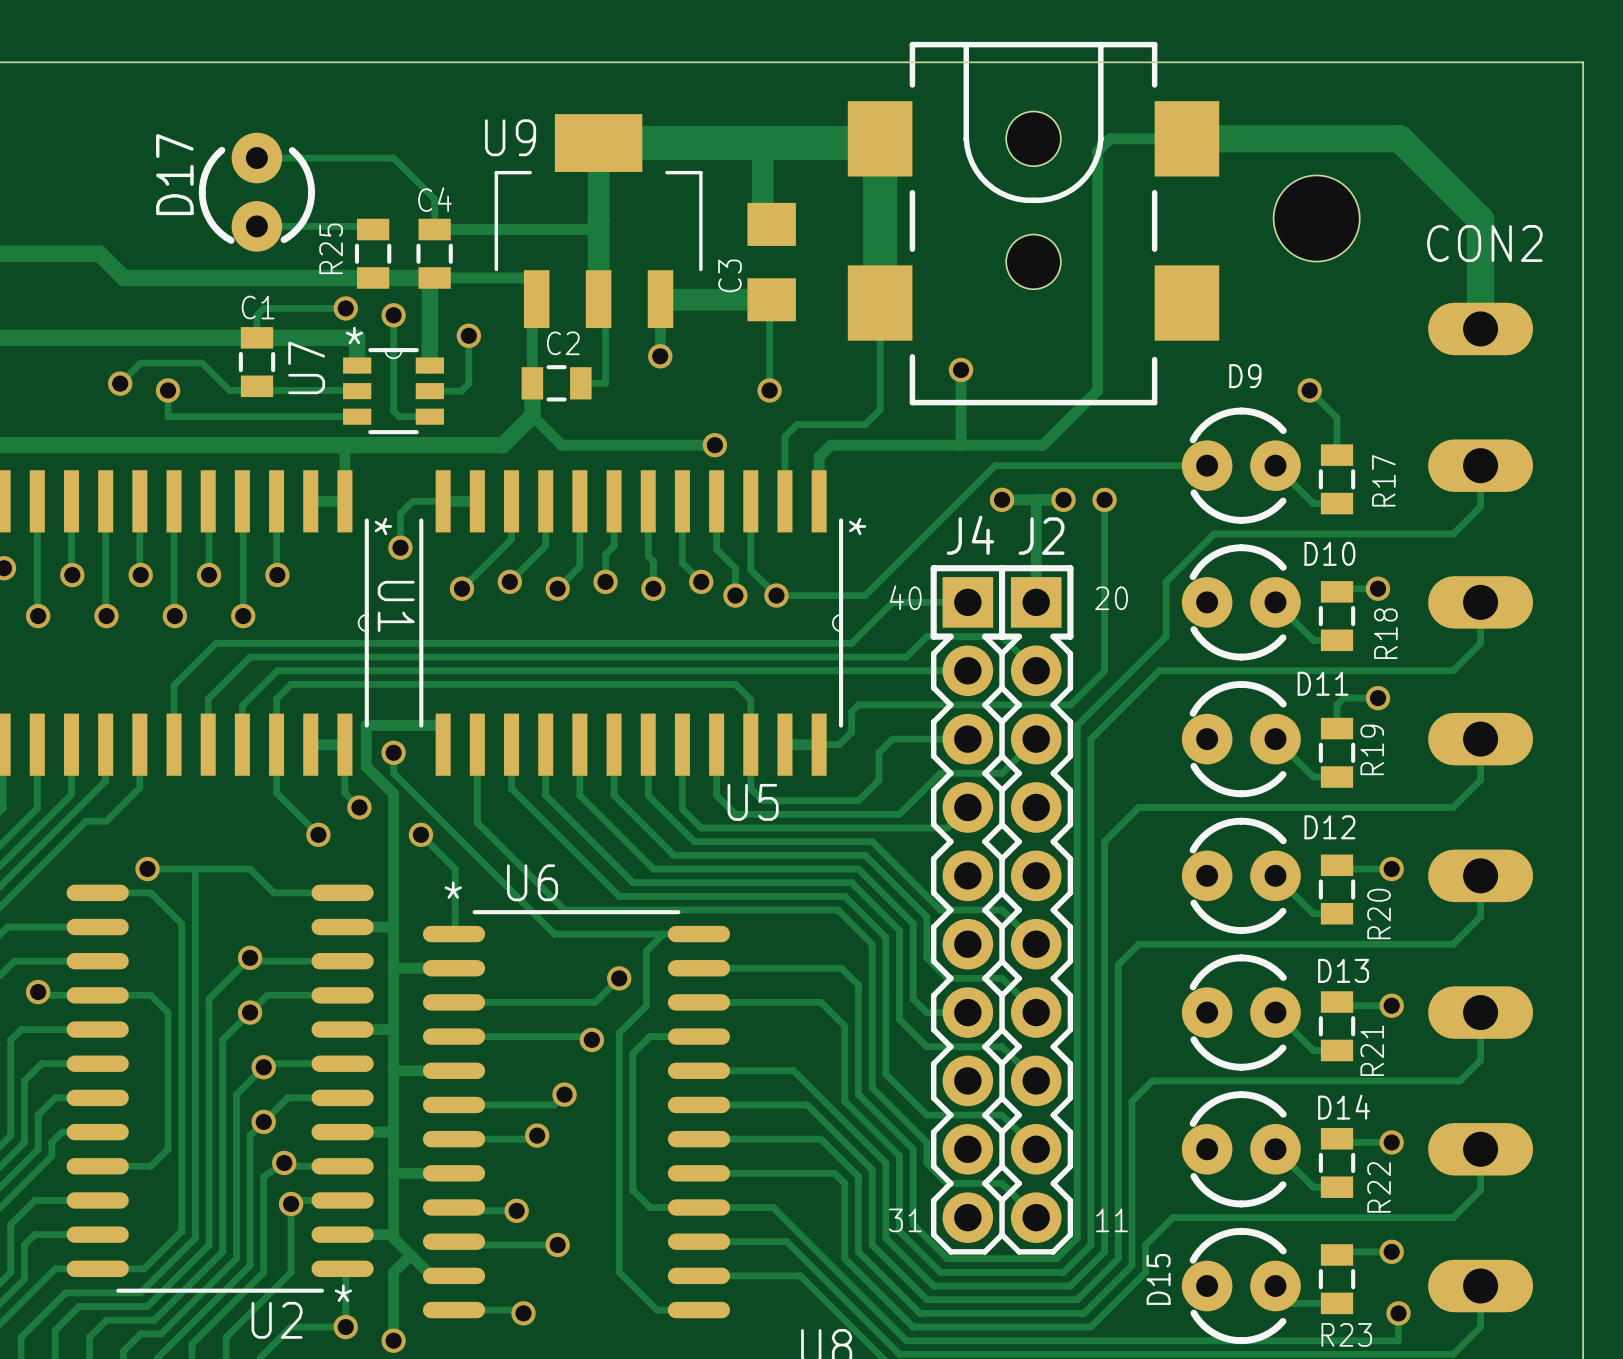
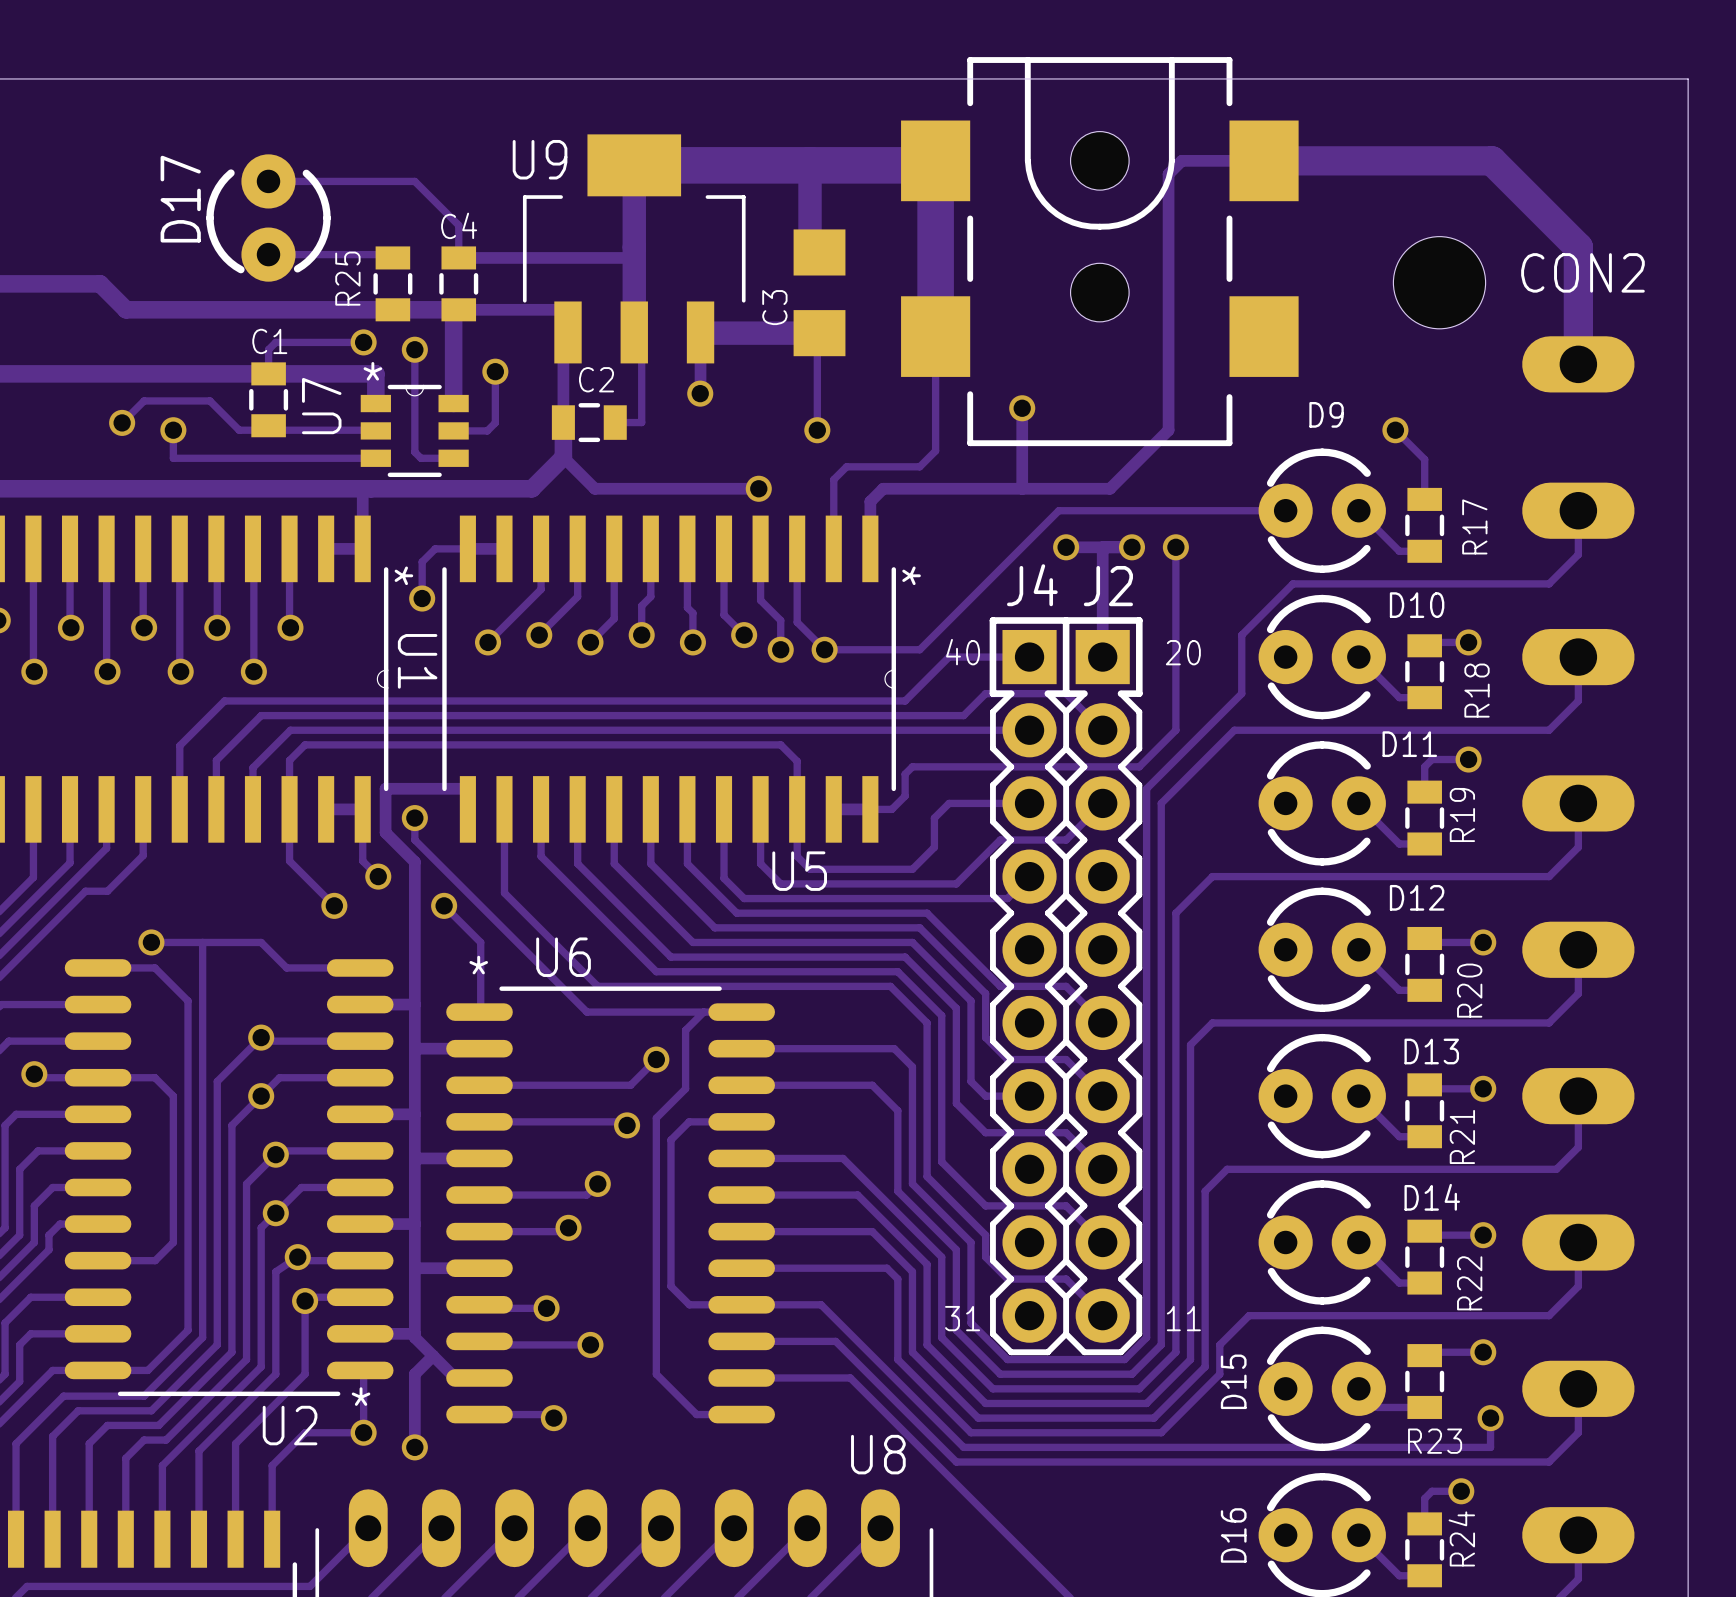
hole position: (1316, 218) -> (1439, 282)

